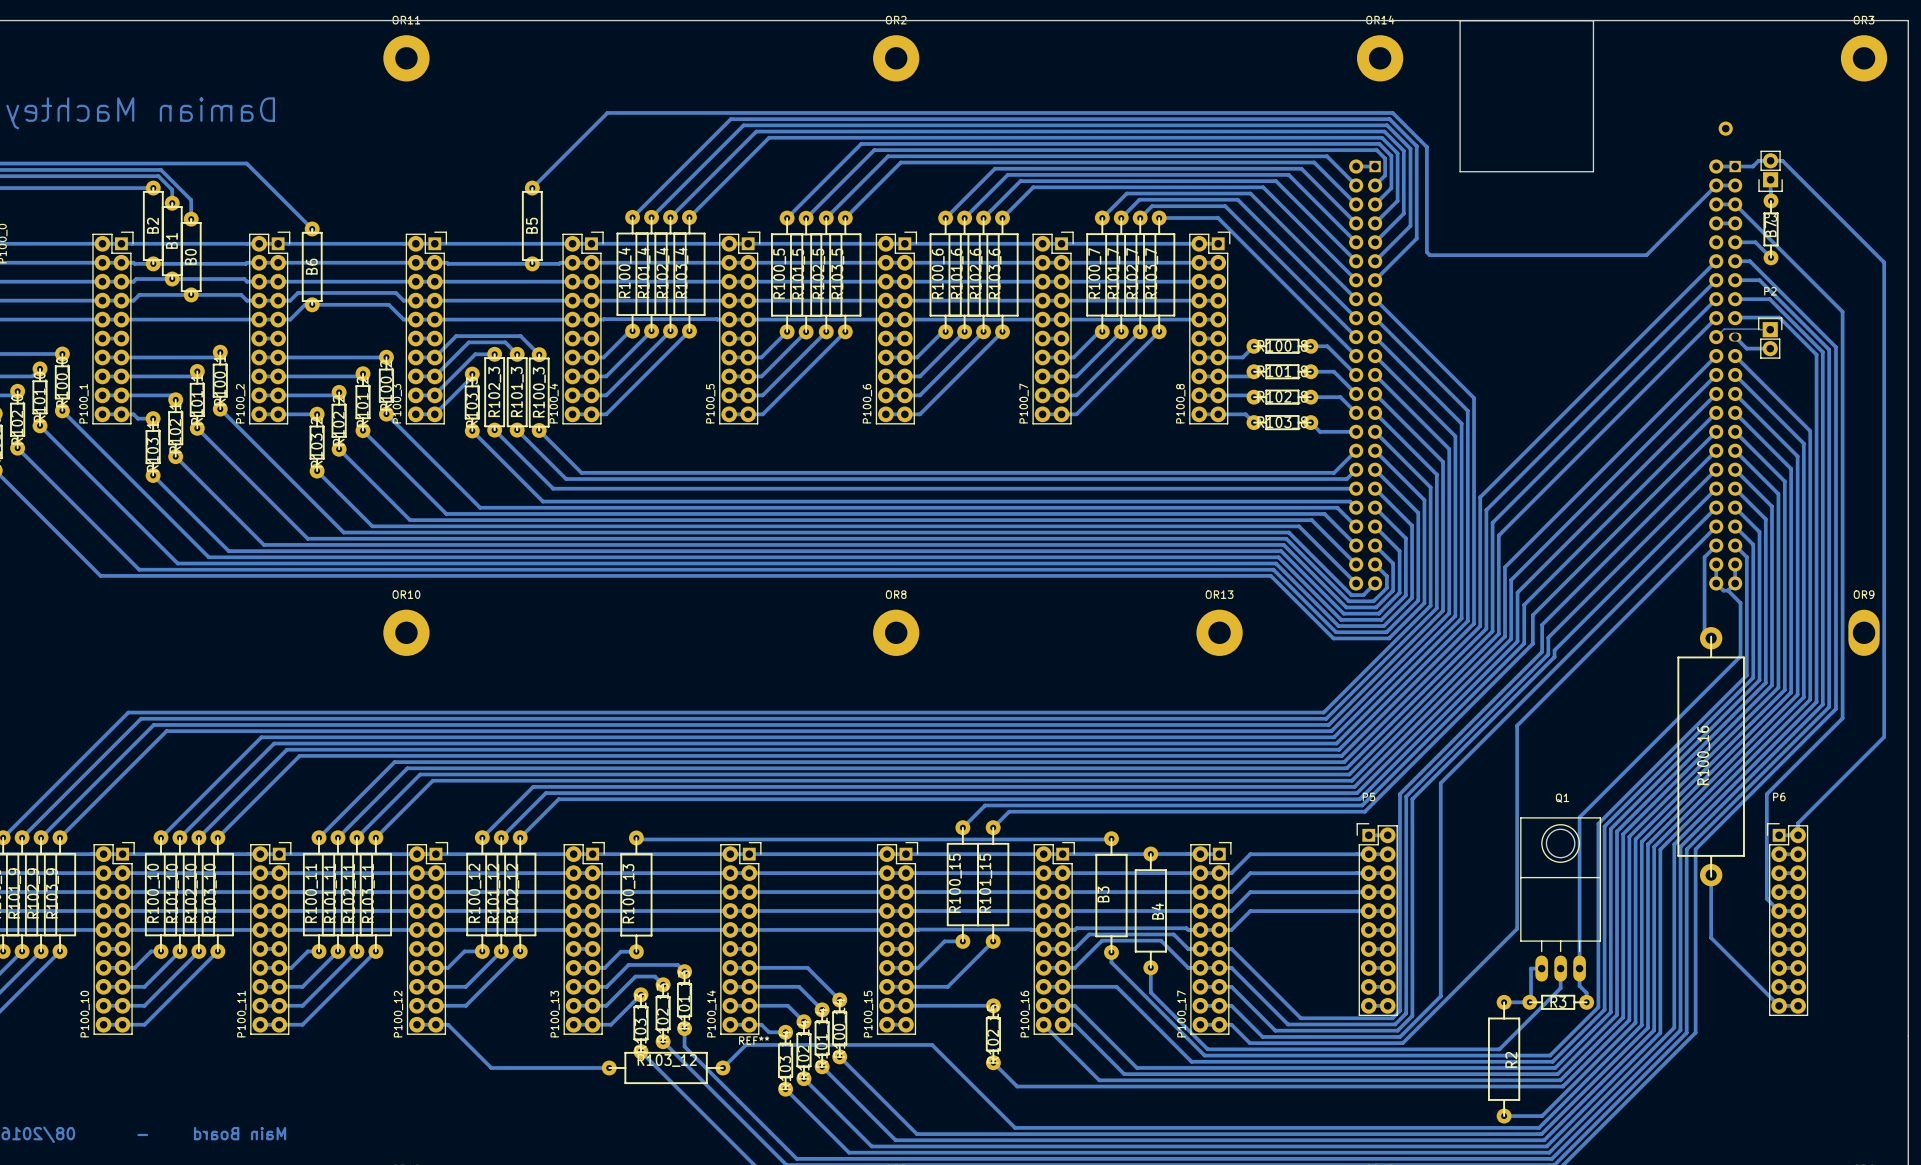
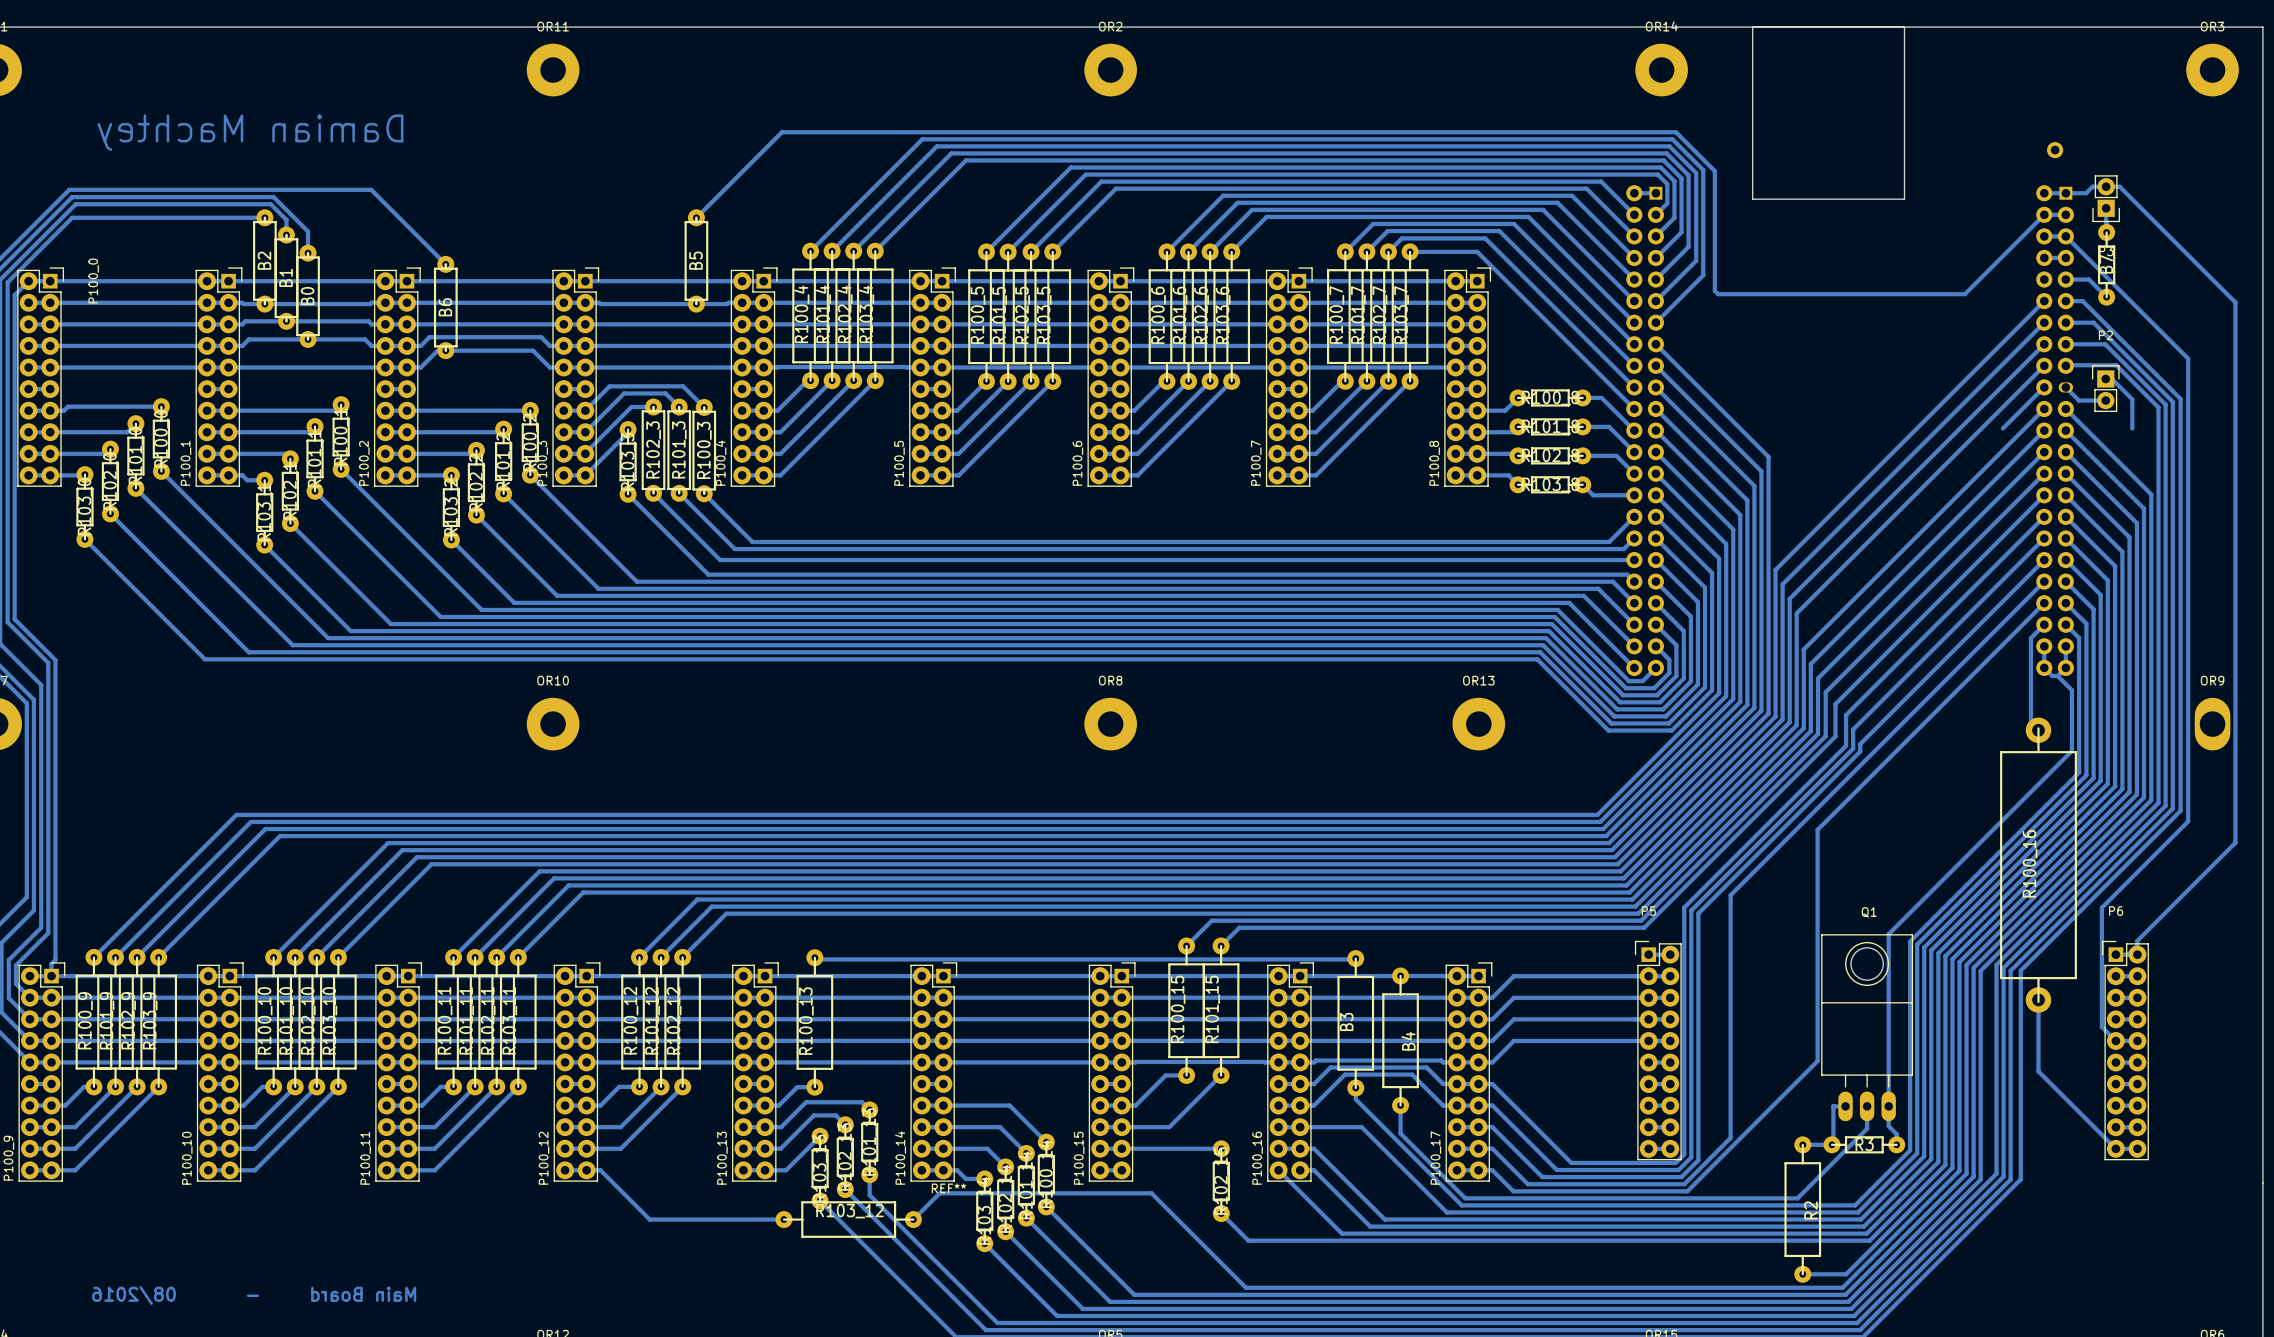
bottom track: (1770, 329) (1724, 329) (1716, 337) -> (2105, 378) (2111, 378) (2132, 399) (2132, 428)
bottom track: none -> (2044, 387) (2002, 428)

